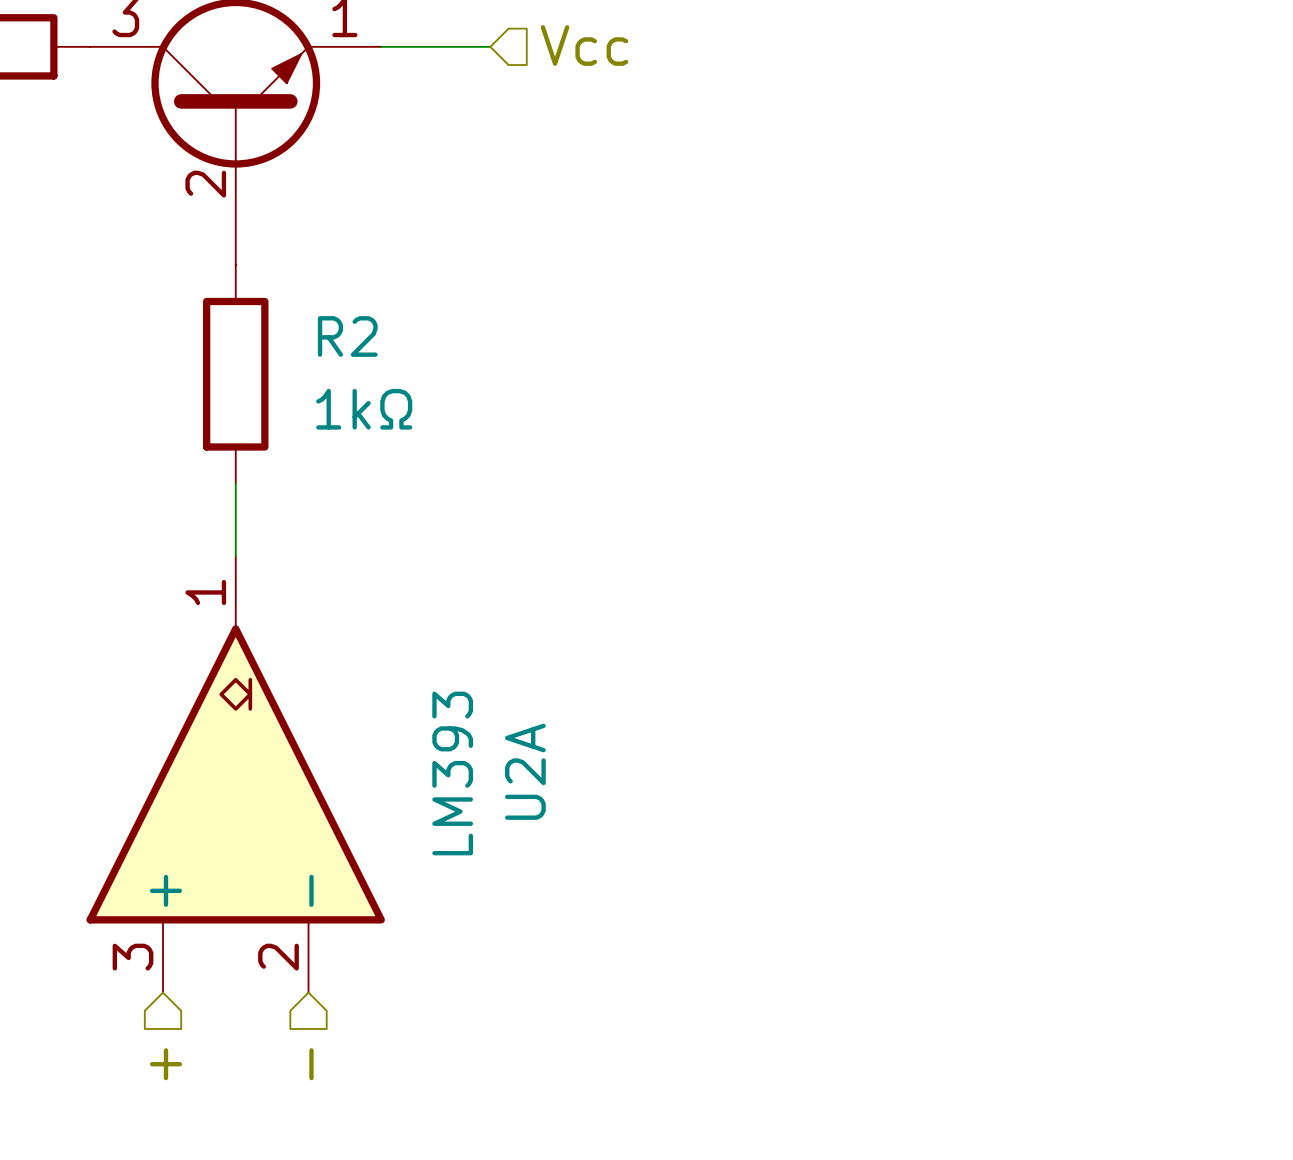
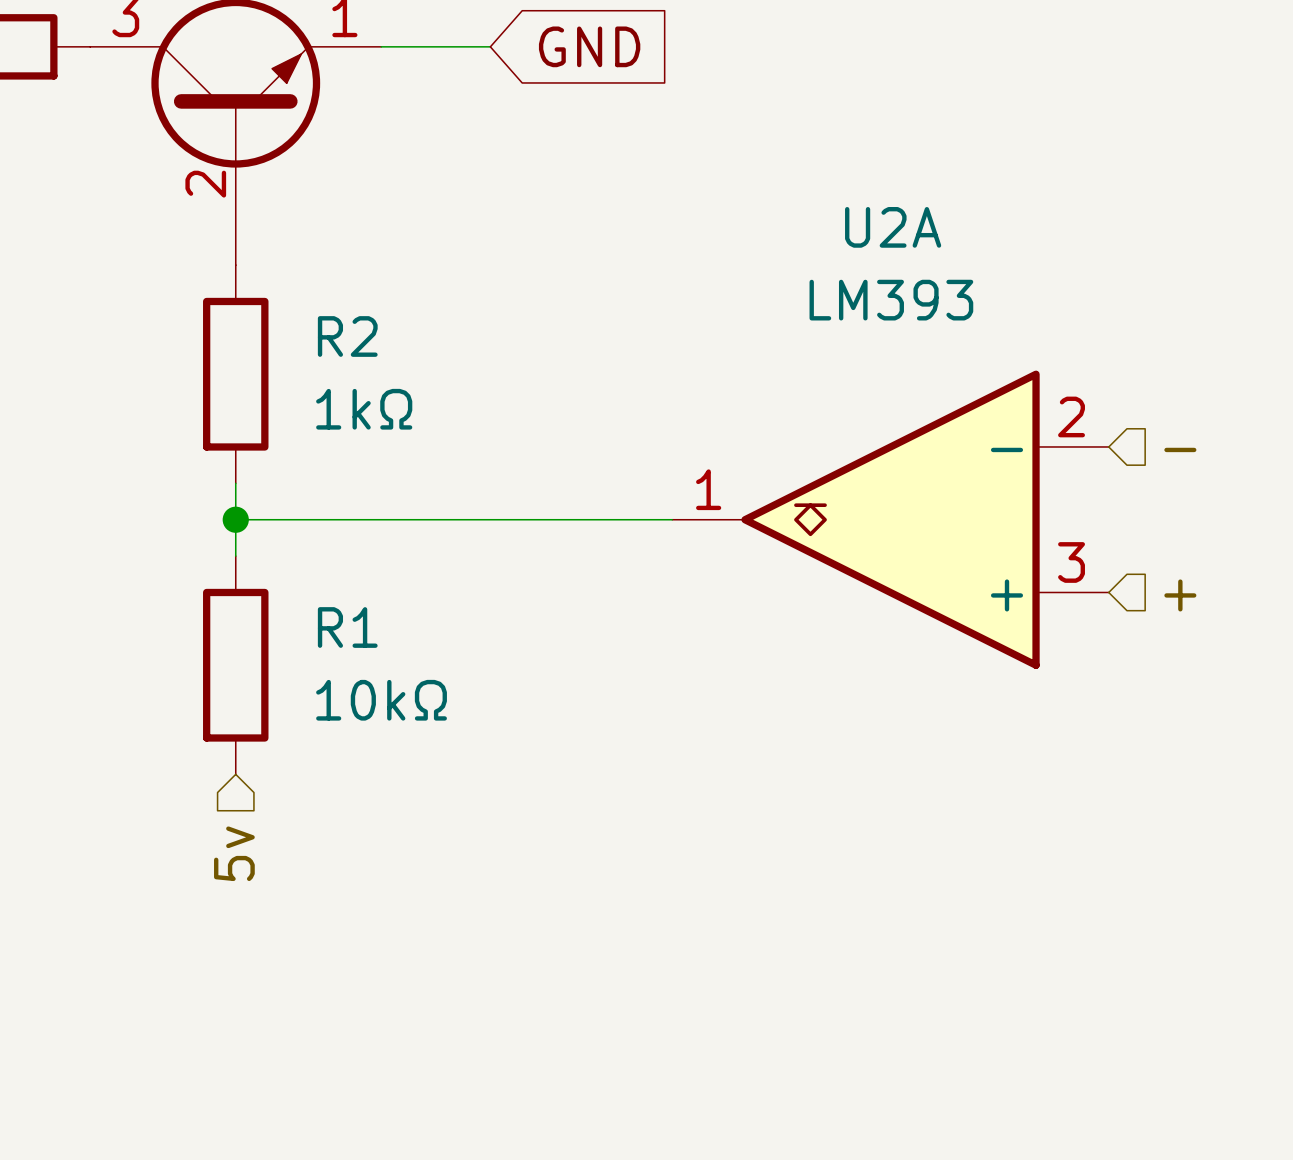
hierarchical label: Vcc (584, 45) -> none
global label: none -> GND (589, 46)
hierarchical label: none -> - (1180, 449)
wire: none -> (235, 519) (672, 519)
junction: none -> (235, 519)
hierarchical label: none -> + (1180, 595)
R1: none -> 10kΩ (235, 665)
U2A rotation: 0° (235, 774) -> 90° counterclockwise (890, 519)
U2A position: (235, 774) -> (890, 519)
hierarchical label: none -> 5v (234, 853)
hierarchical label: + (165, 1064) -> none
hierarchical label: - (311, 1064) -> none

